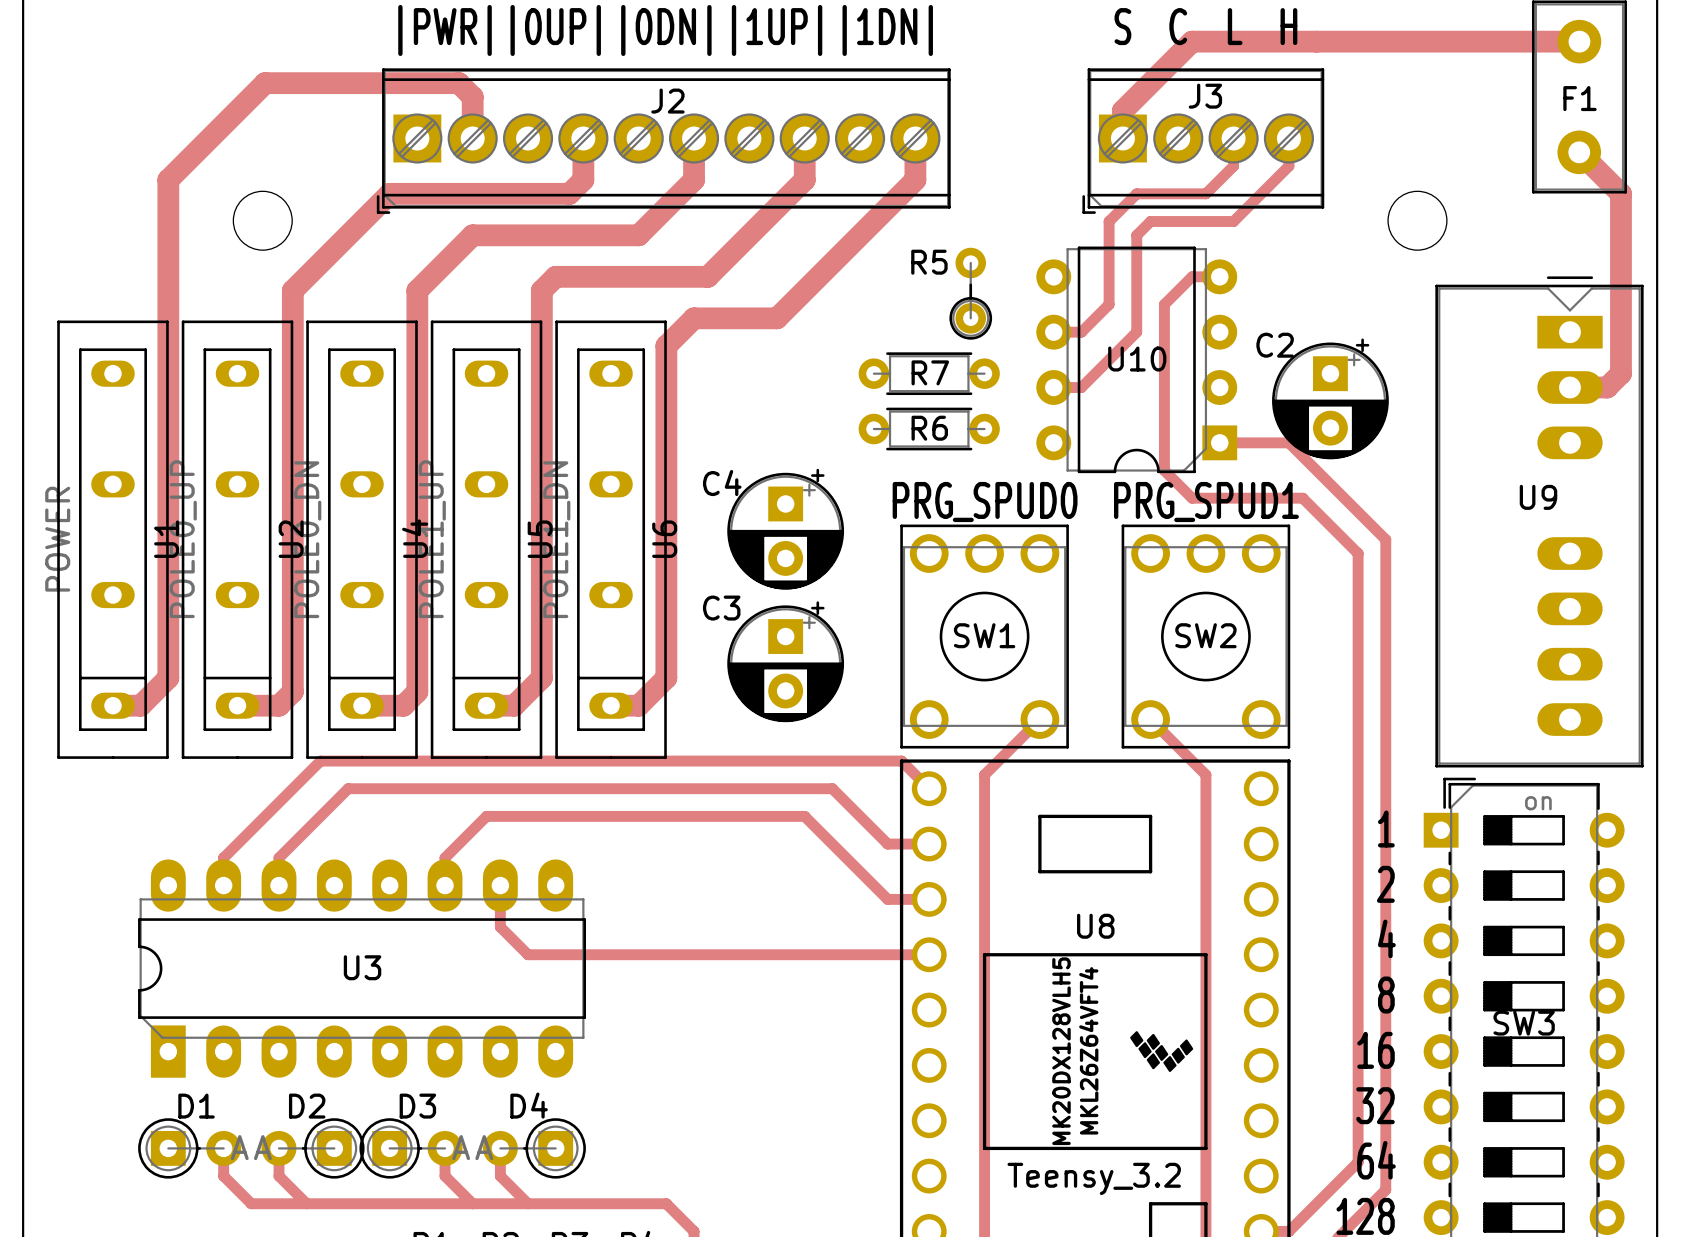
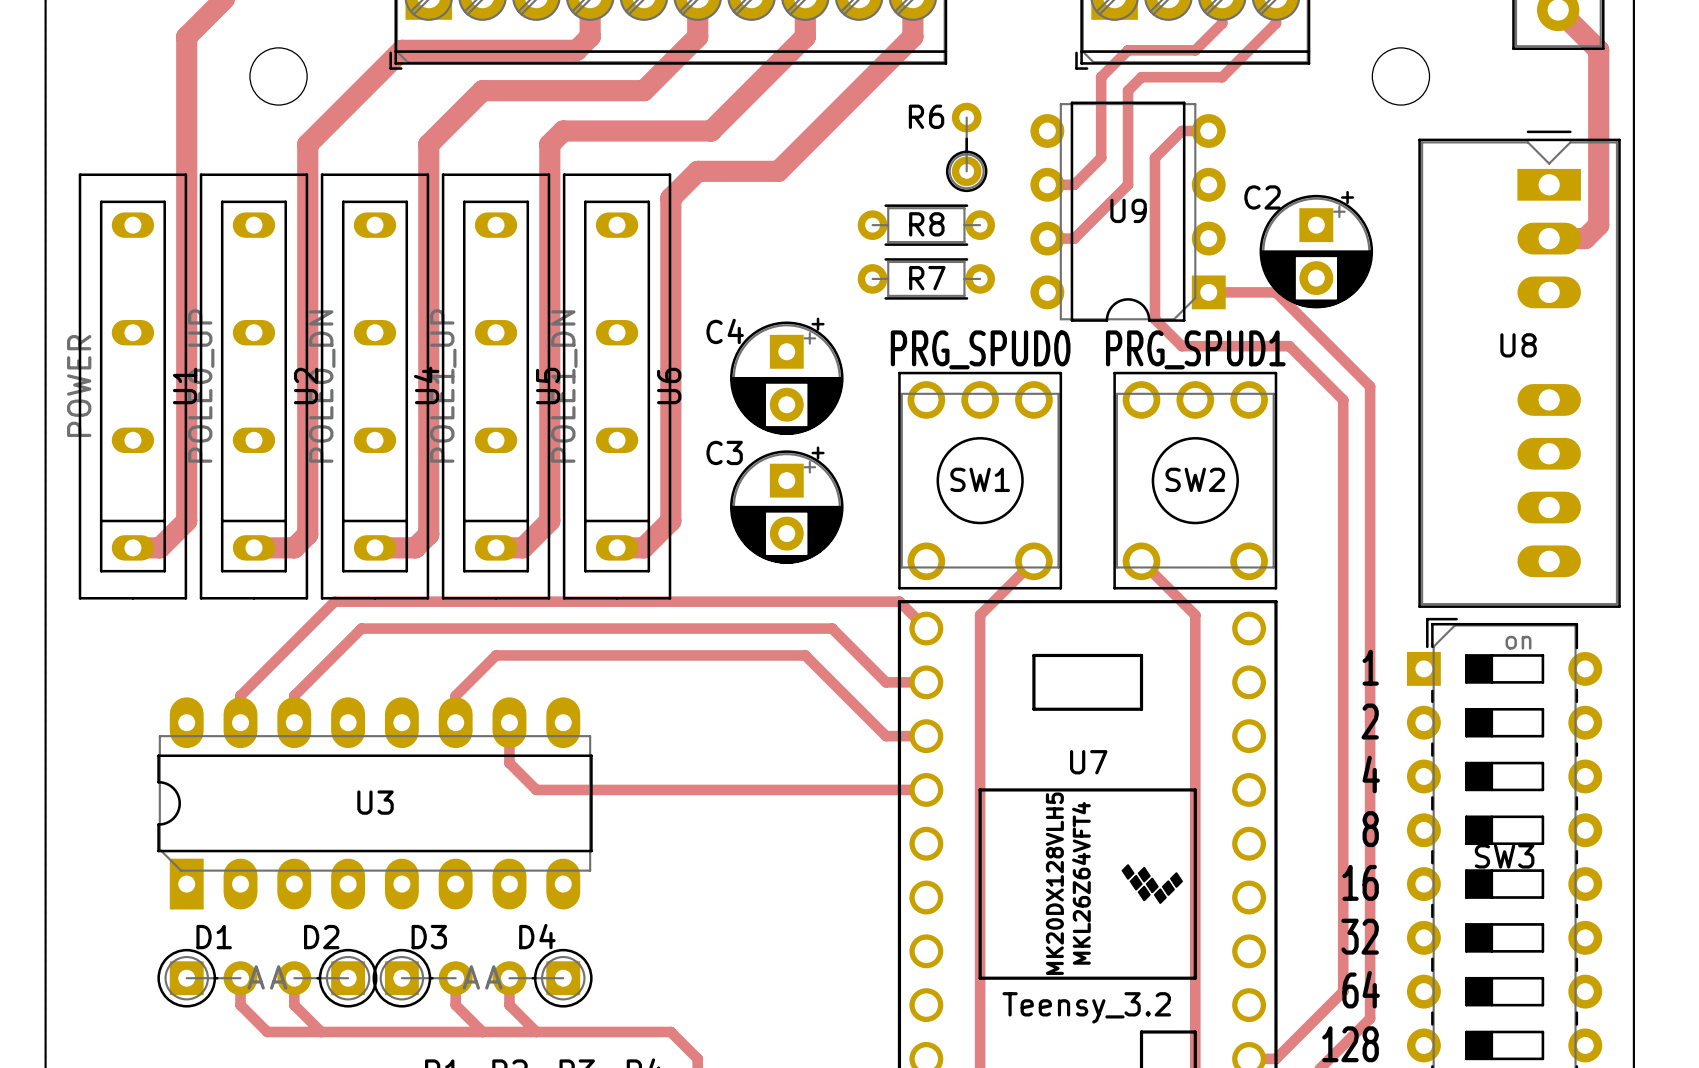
R5 name: R5 (929, 262) -> R6 (926, 116)
U10 name: U10 (1137, 359) -> U9 (1128, 210)
R7 name: R7 (930, 372) -> R8 (926, 224)
R6 name: R6 (929, 428) -> R7 (927, 278)
U9 name: U9 (1538, 497) -> U8 (1518, 345)
U8 name: U8 (1095, 926) -> U7 (1088, 762)

